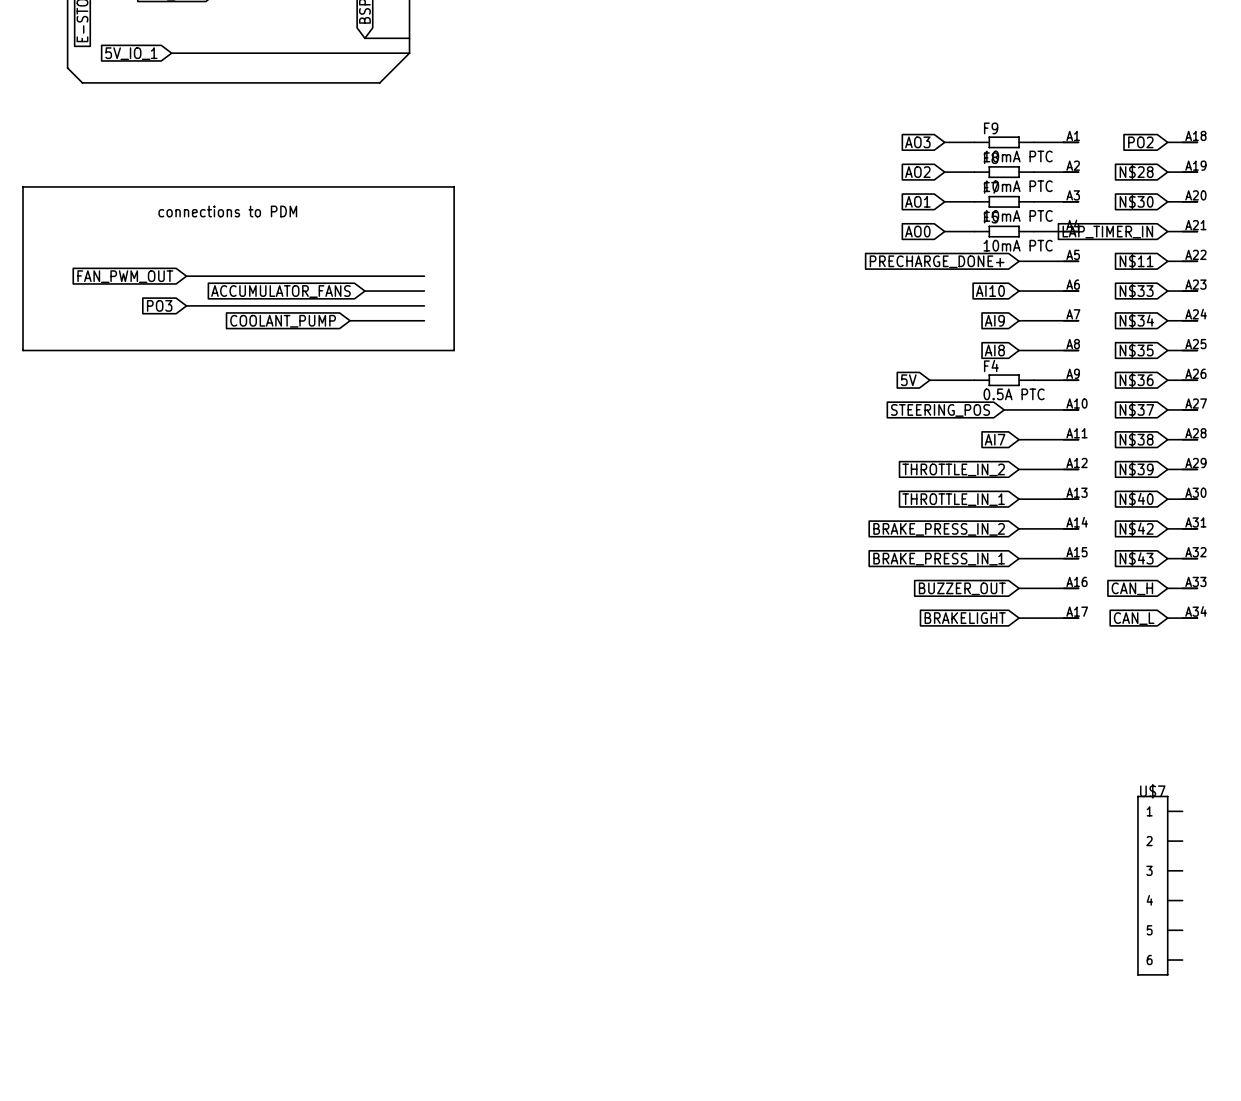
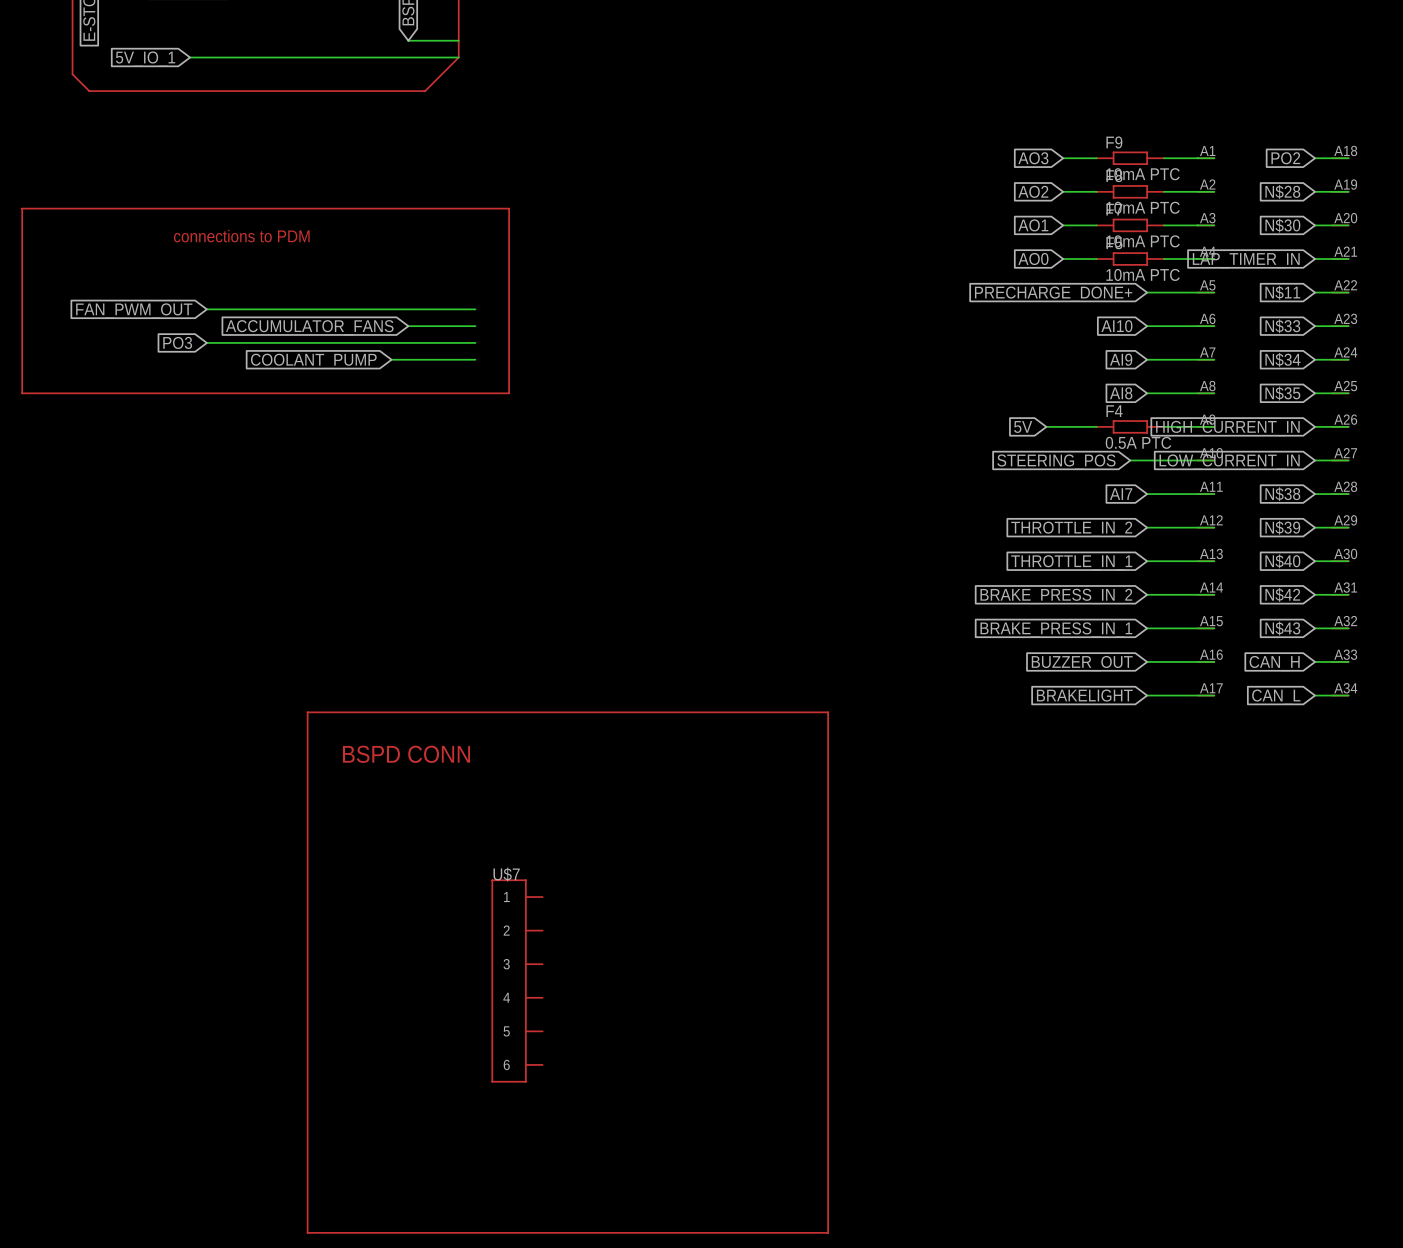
global label: N$36 (1136, 380) -> HIGH_CURRENT_IN (1227, 428)
global label: N$37 (1136, 409) -> LOW_CURRENT_IN (1229, 462)
line: none -> (307, 712) (828, 712) (828, 1232) (307, 1232) (307, 712)
text: none -> BSPD CONN (406, 754)
U$7 position: (1159, 885) -> (517, 980)

